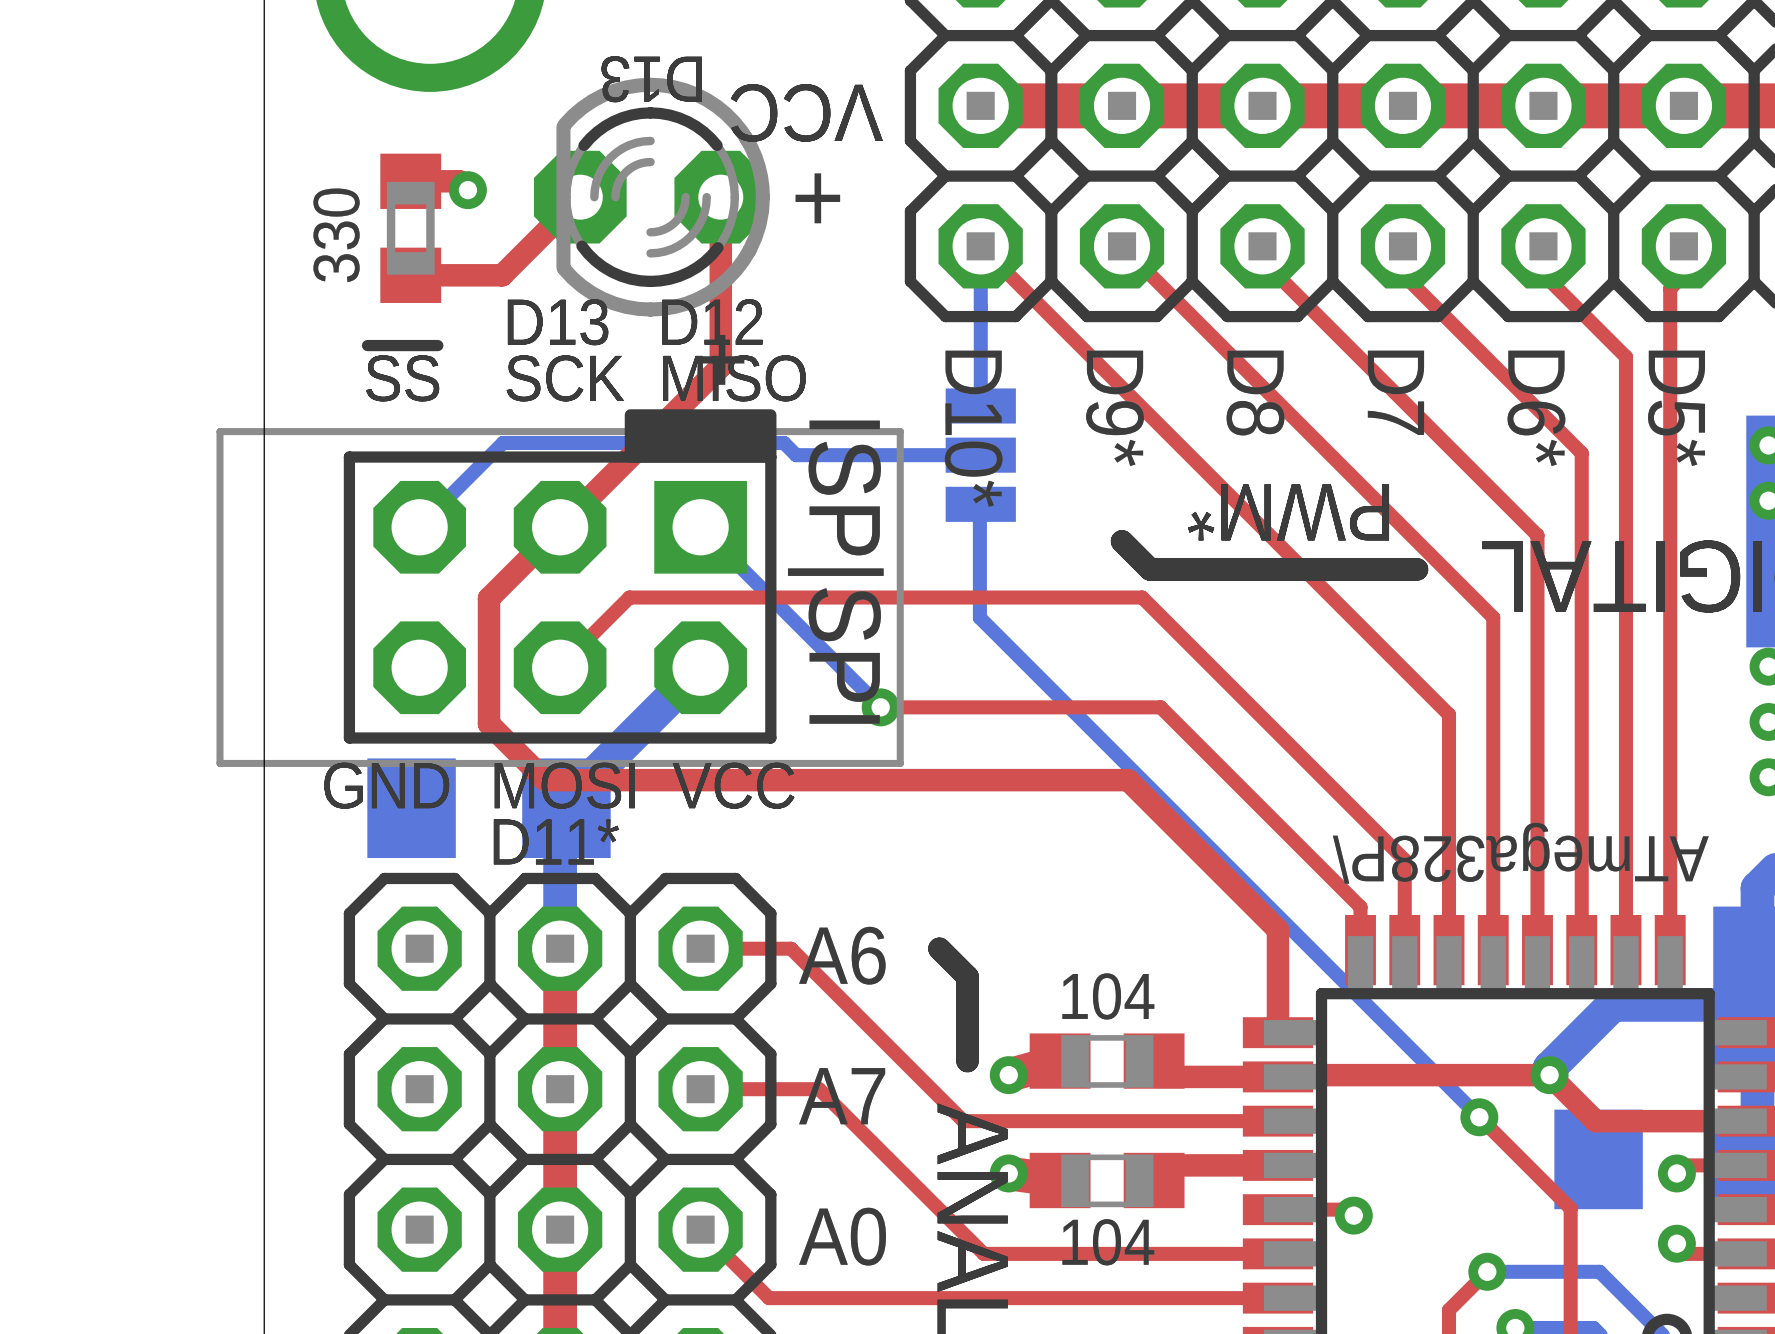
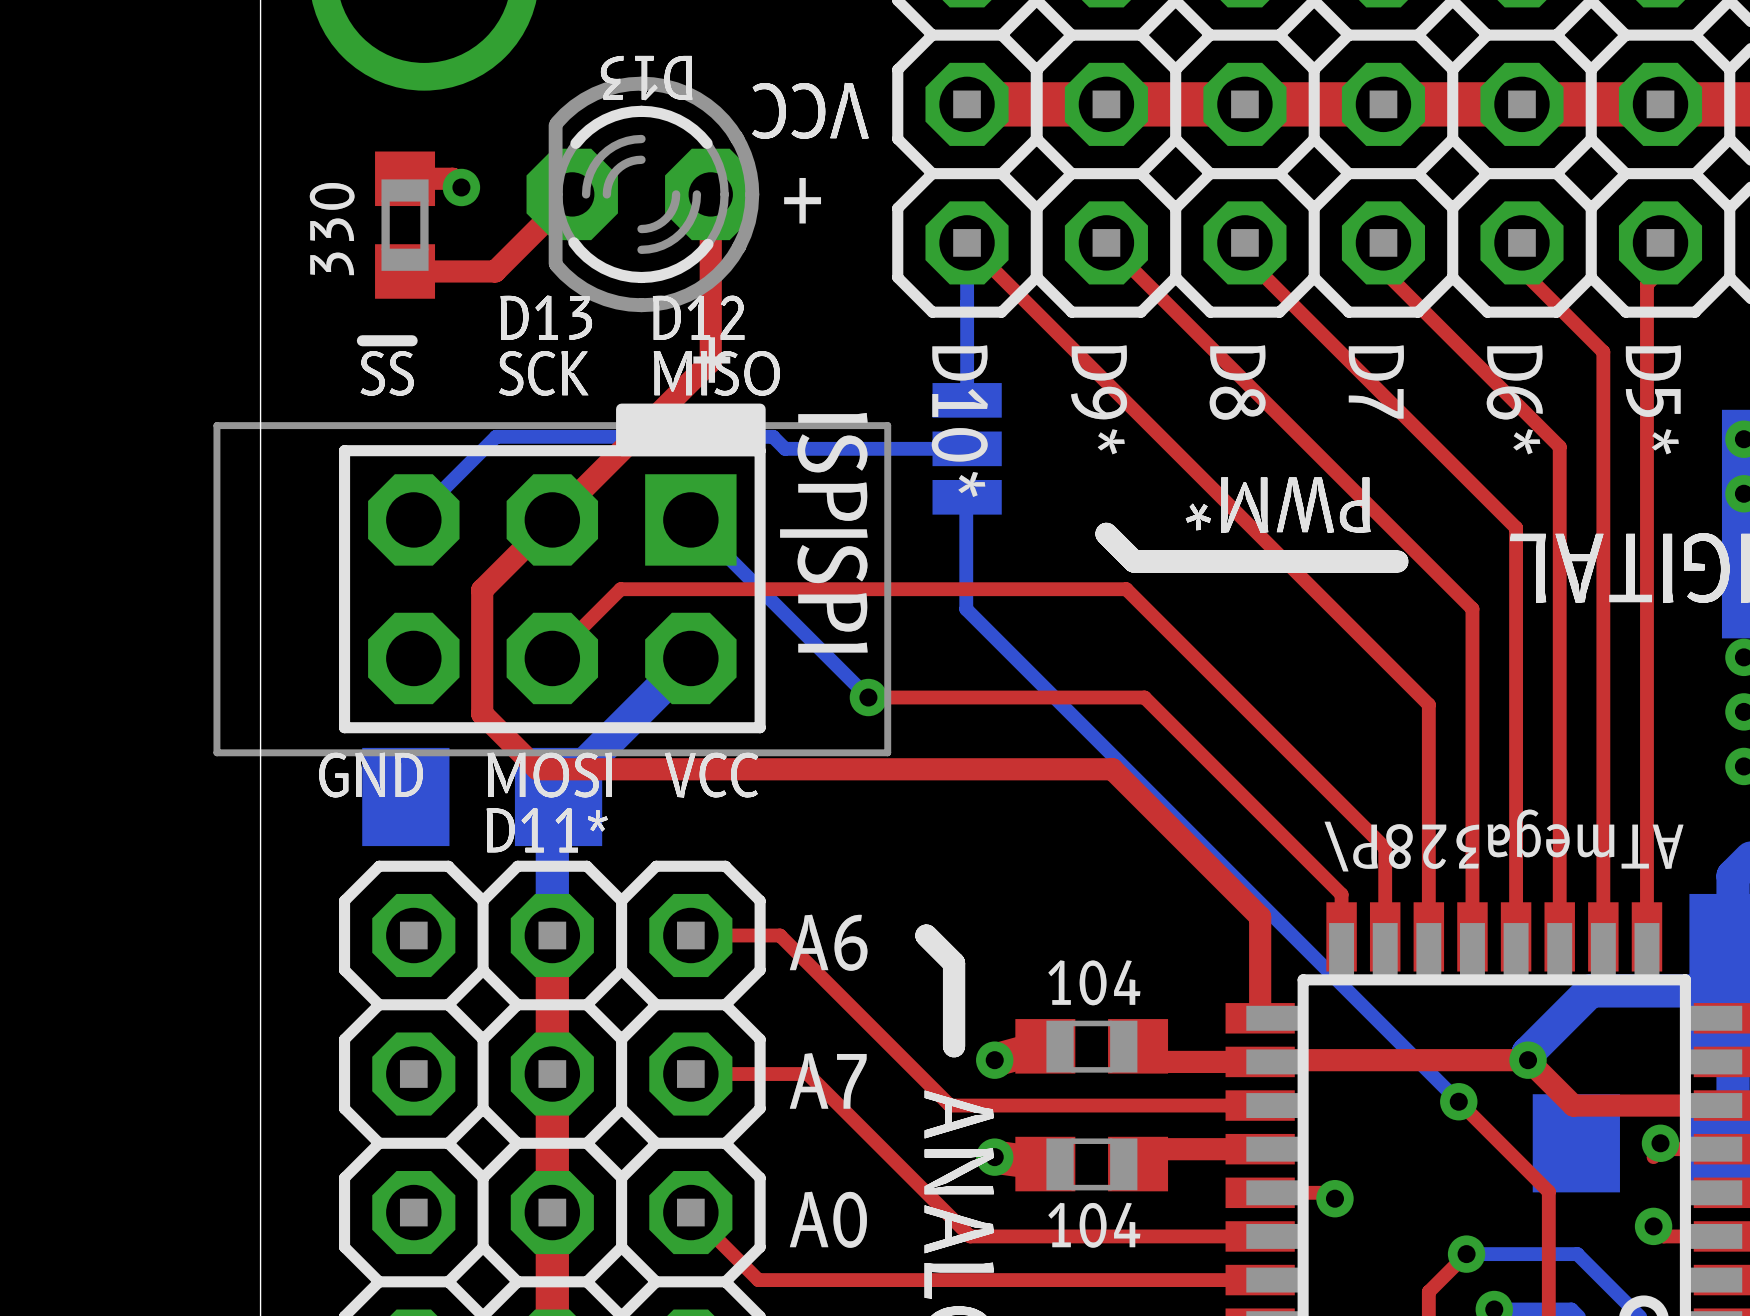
via position: (1676, 1173) -> (1660, 1143)

